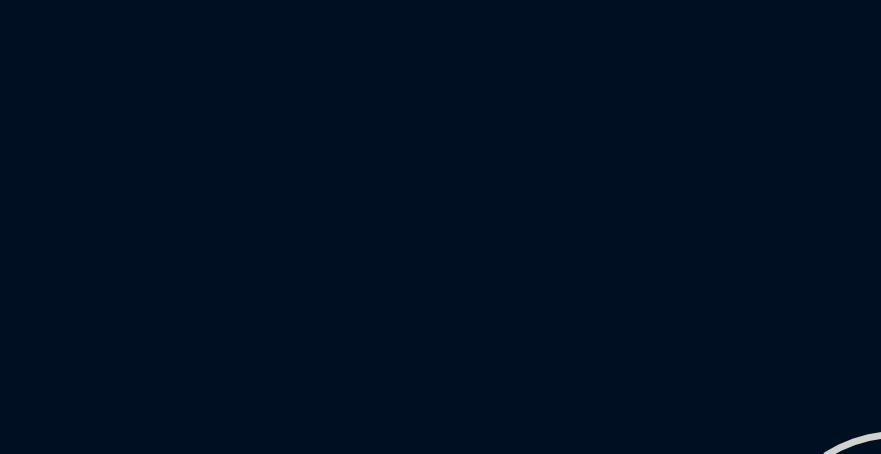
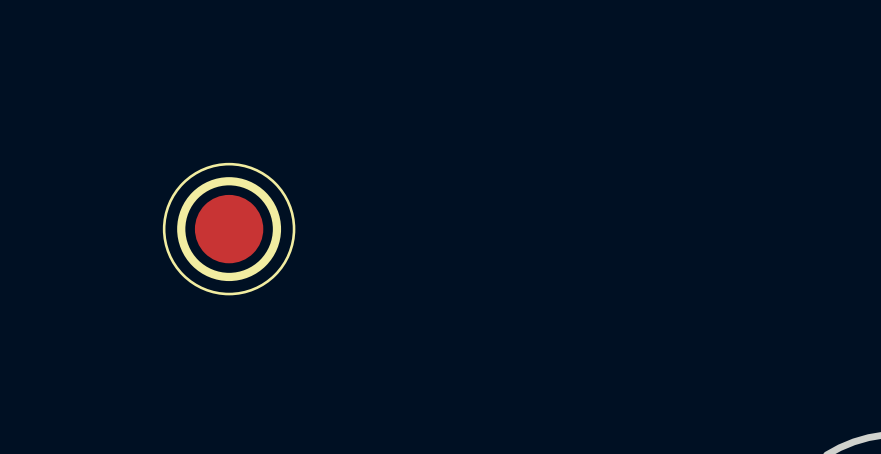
drawing: none -> [162, 162, 296, 296]
part: none -> (229, 229)

